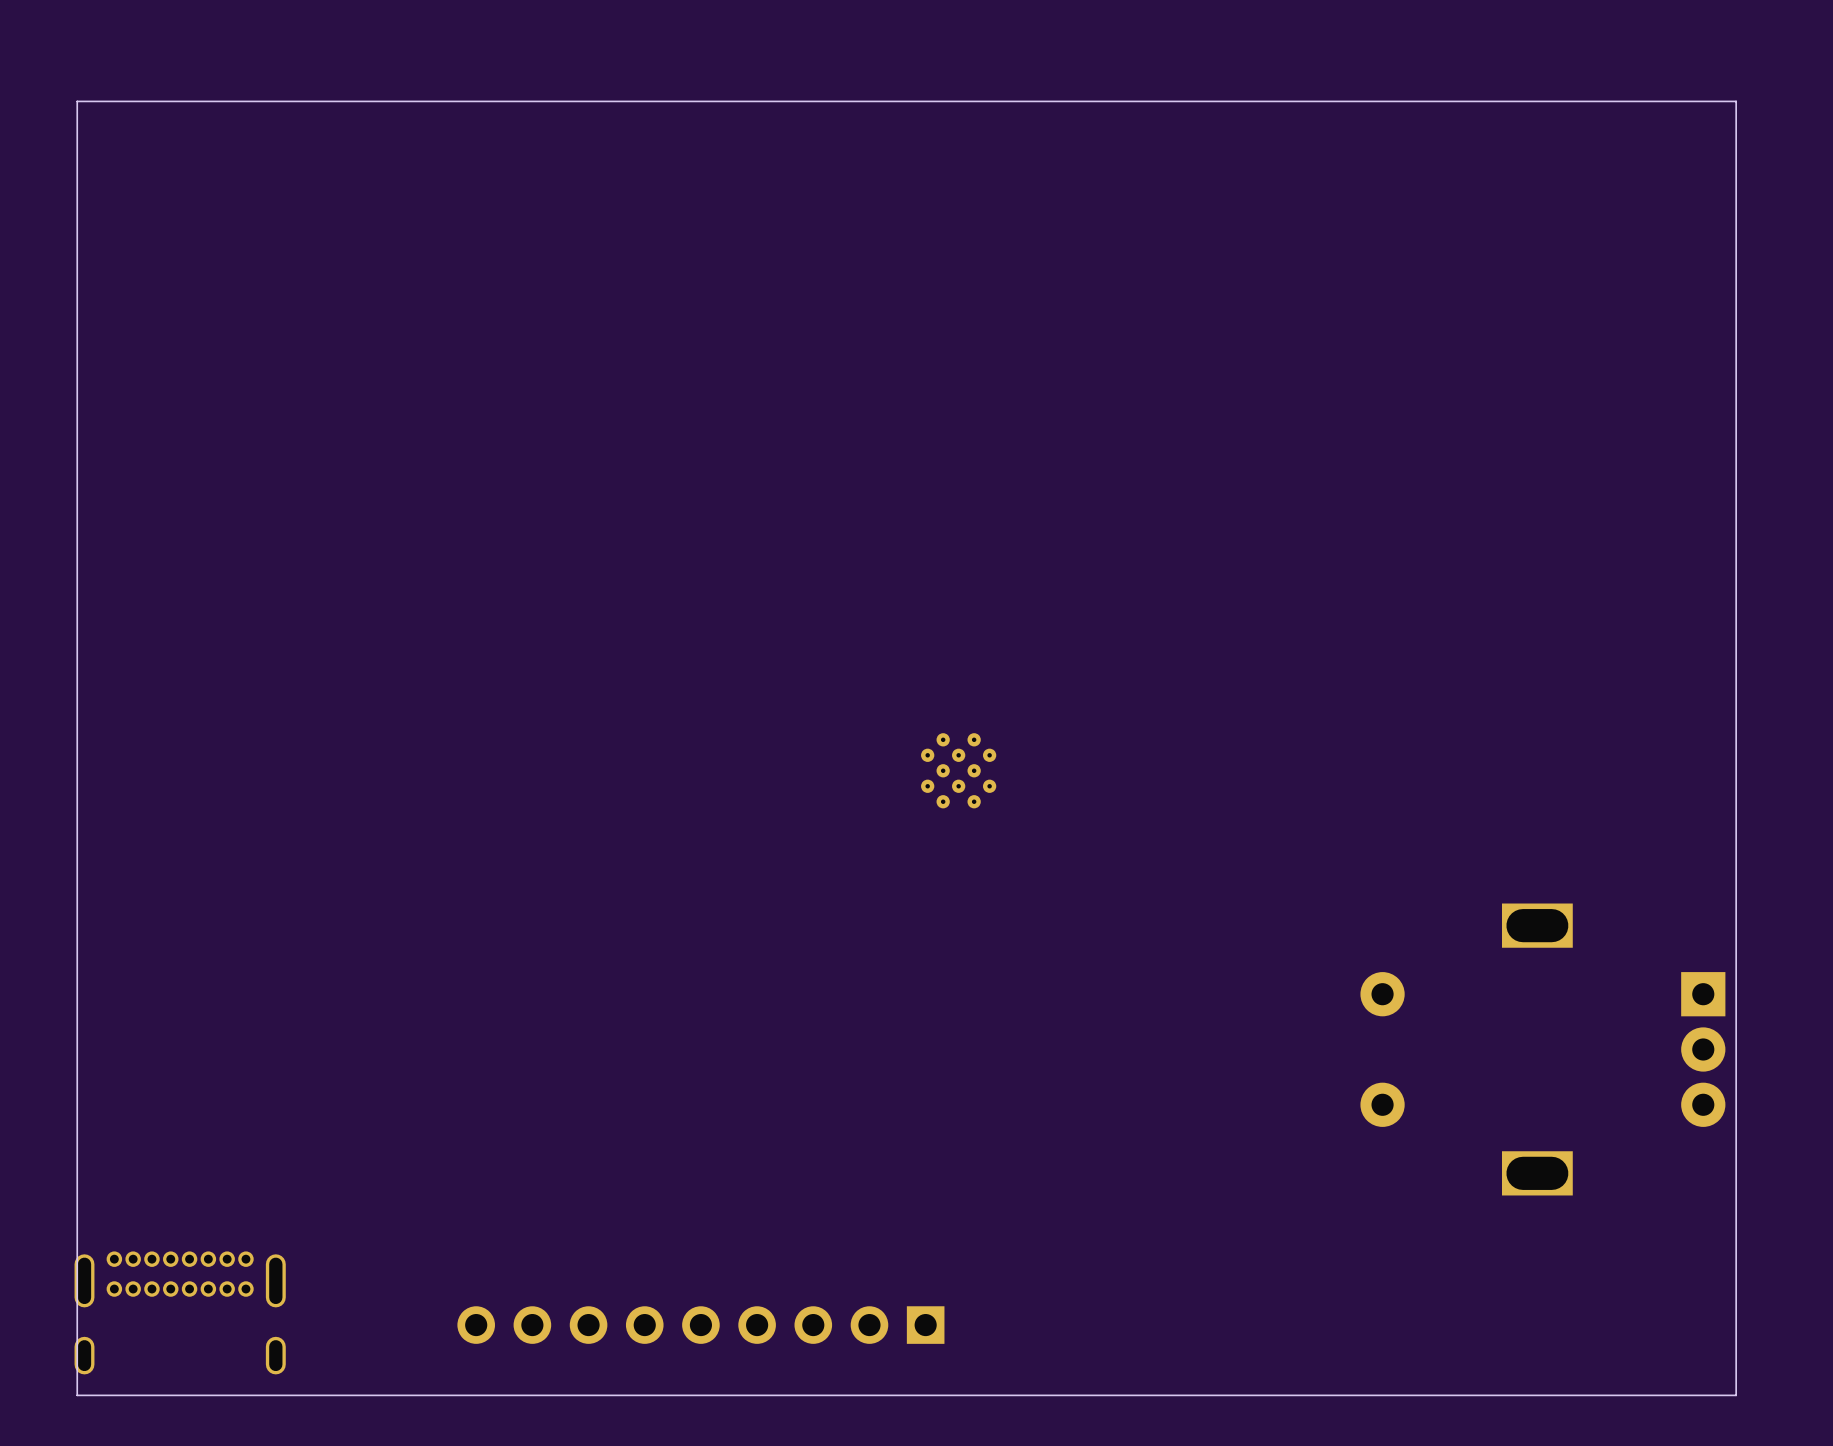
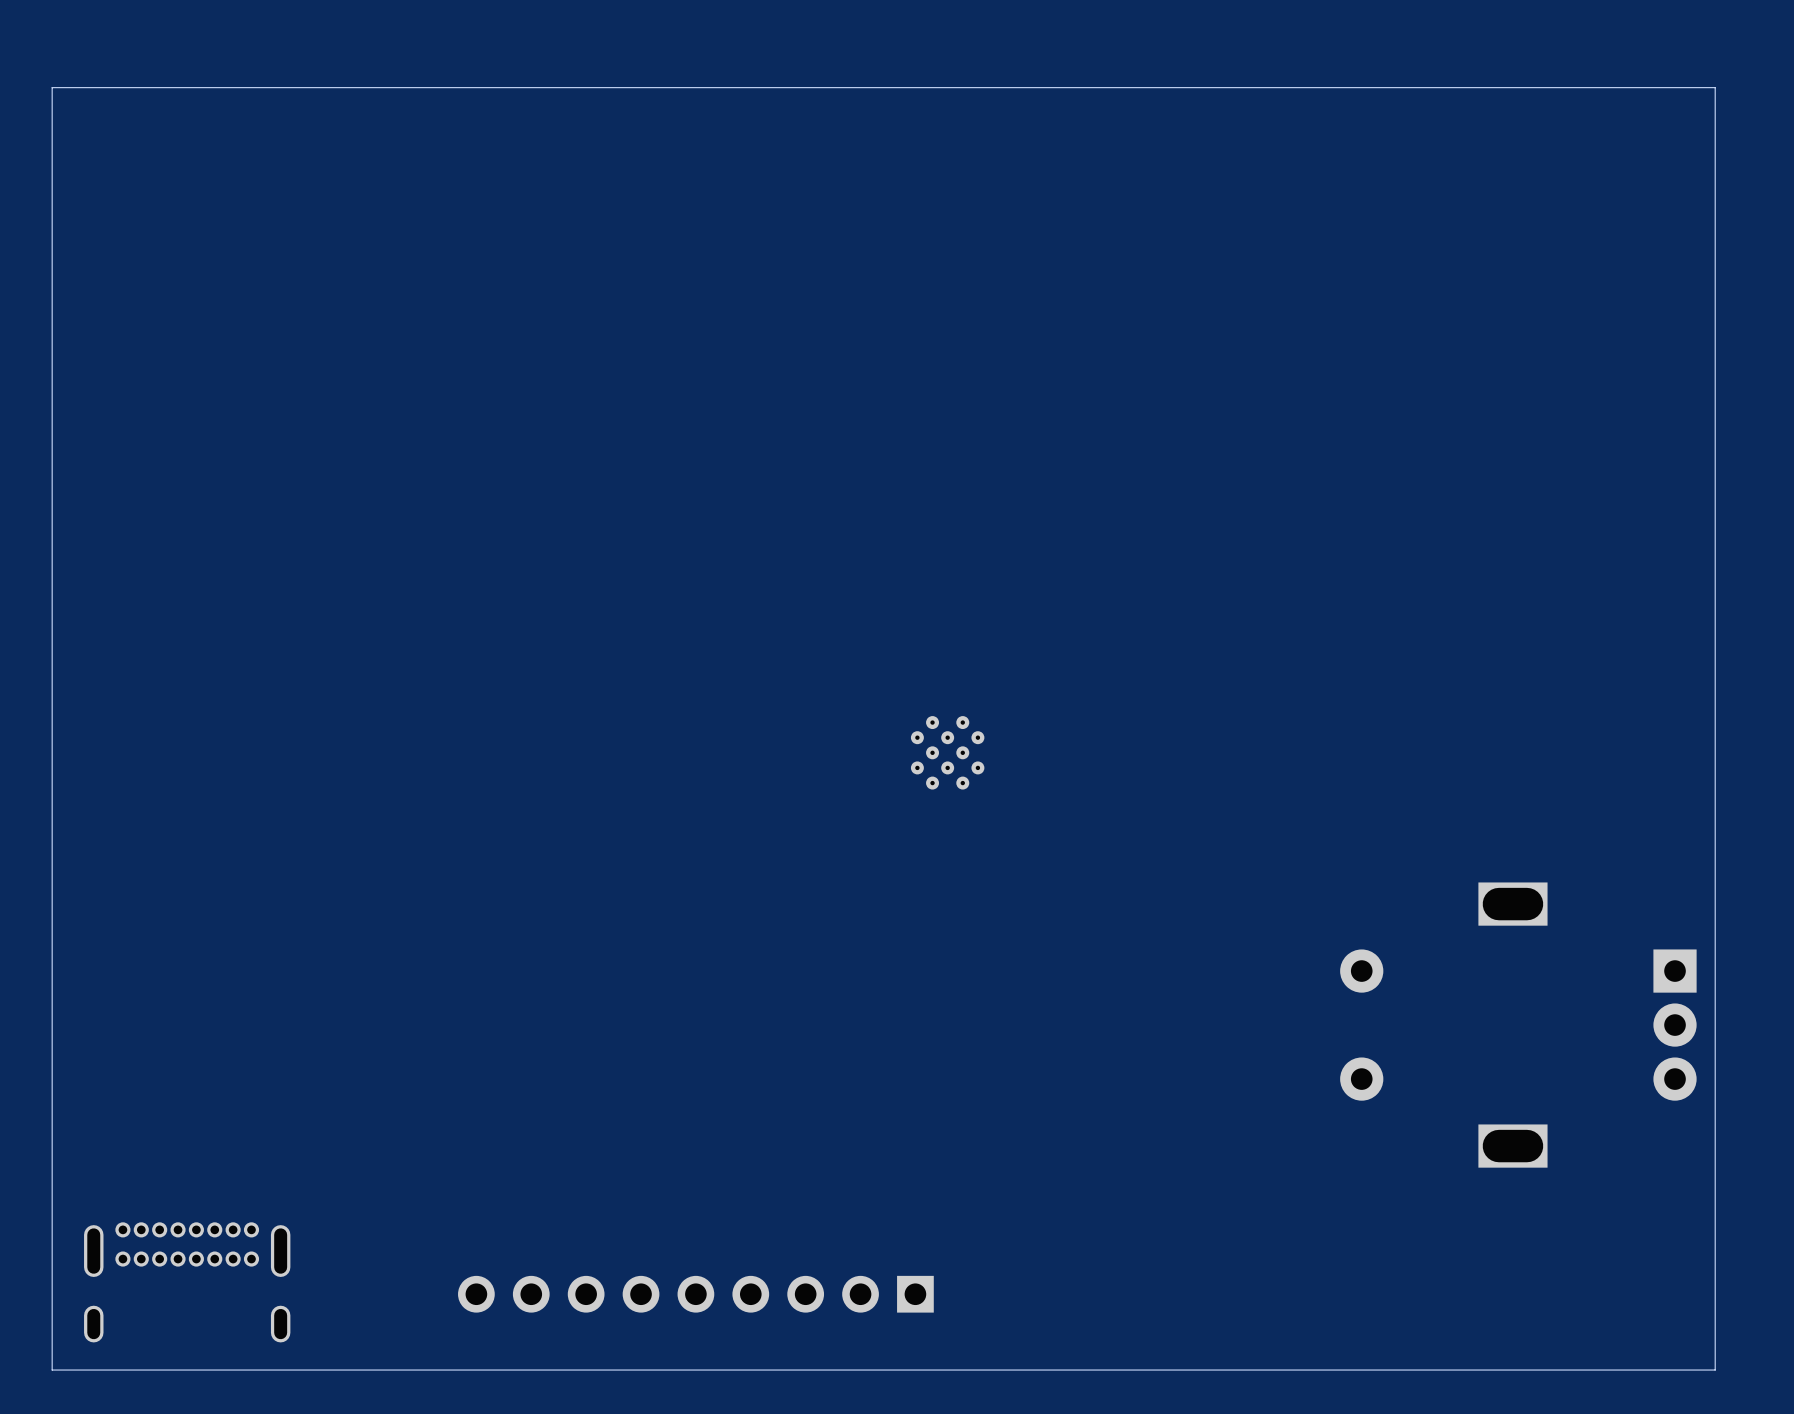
board edge: (1736, 101) (77, 101) (77, 1395) (1736, 1395) (1736, 101) -> (1715, 87) (1715, 1370) (52, 1370) (52, 87) (1715, 87)

